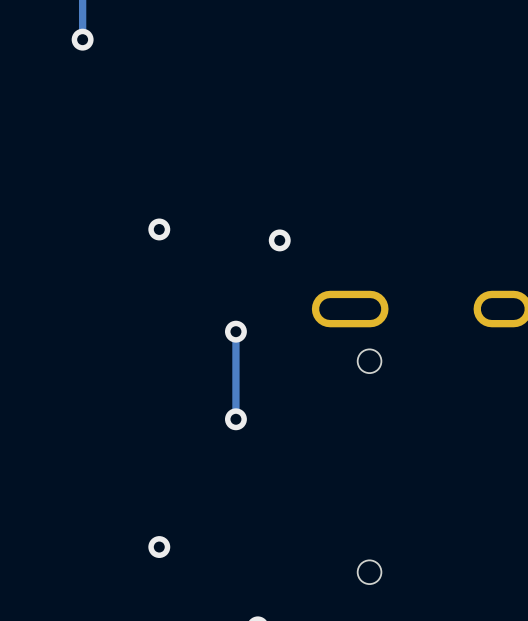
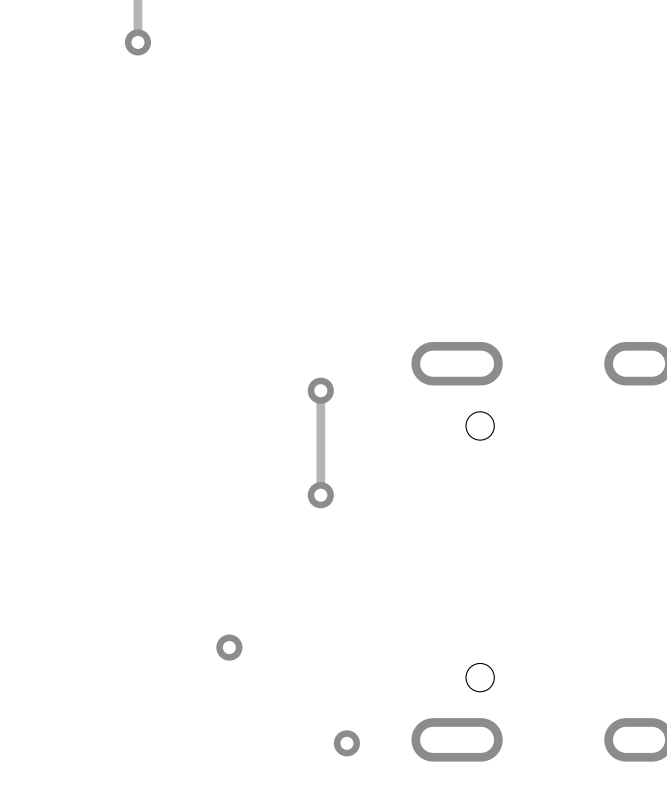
via: (159, 229) -> none
via: (279, 240) -> none

